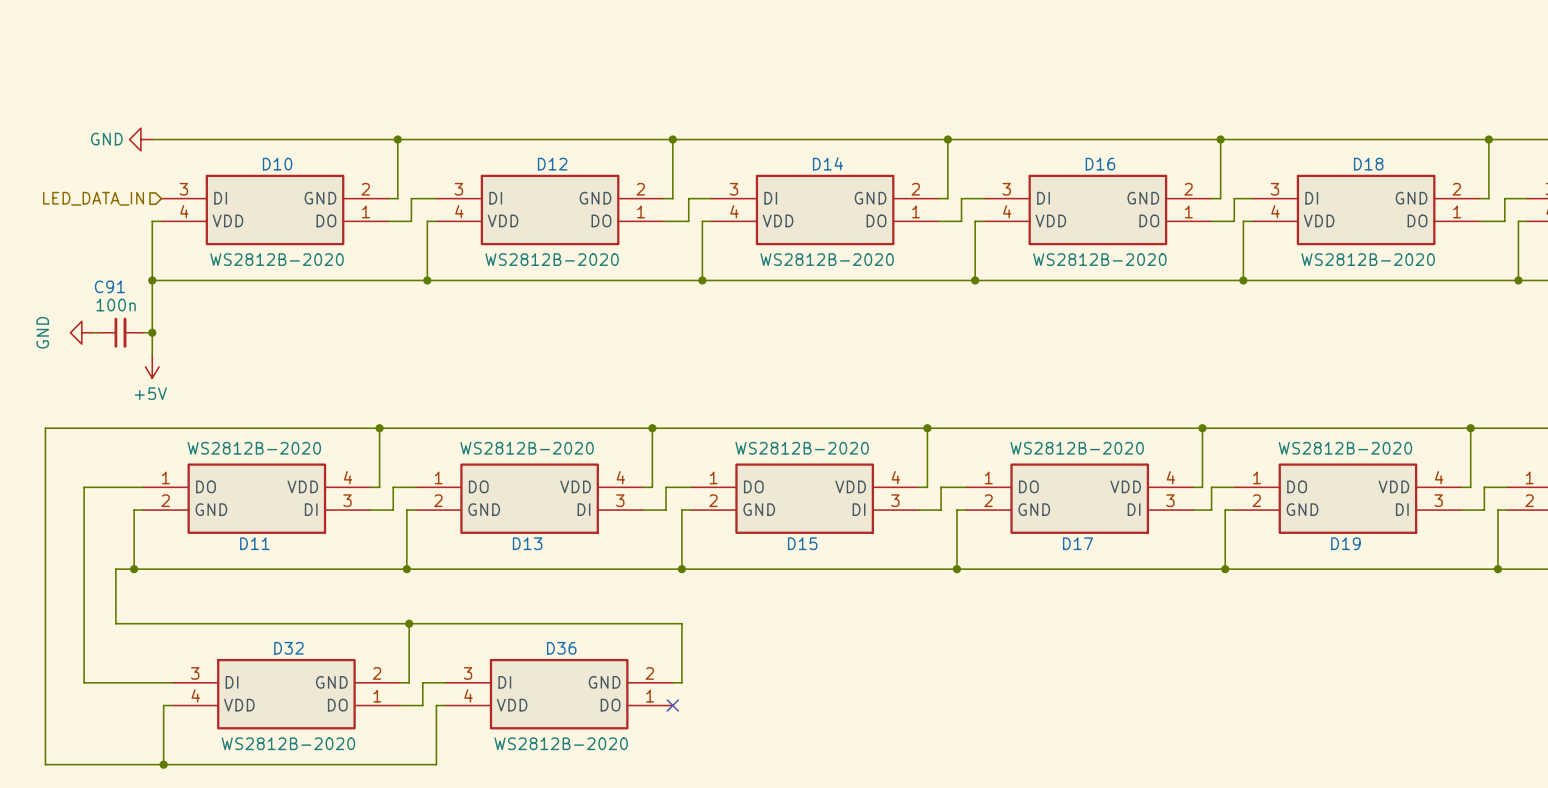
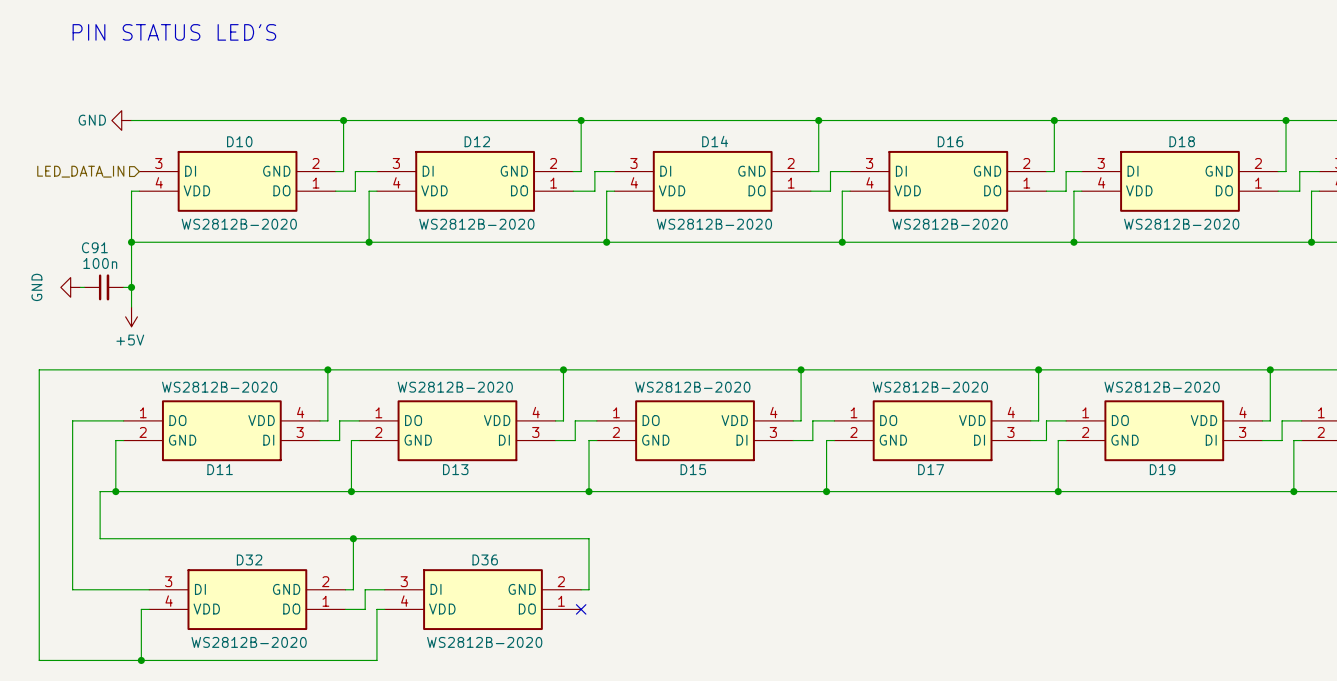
text: none -> PIN STATUS LED'S (174, 32)

